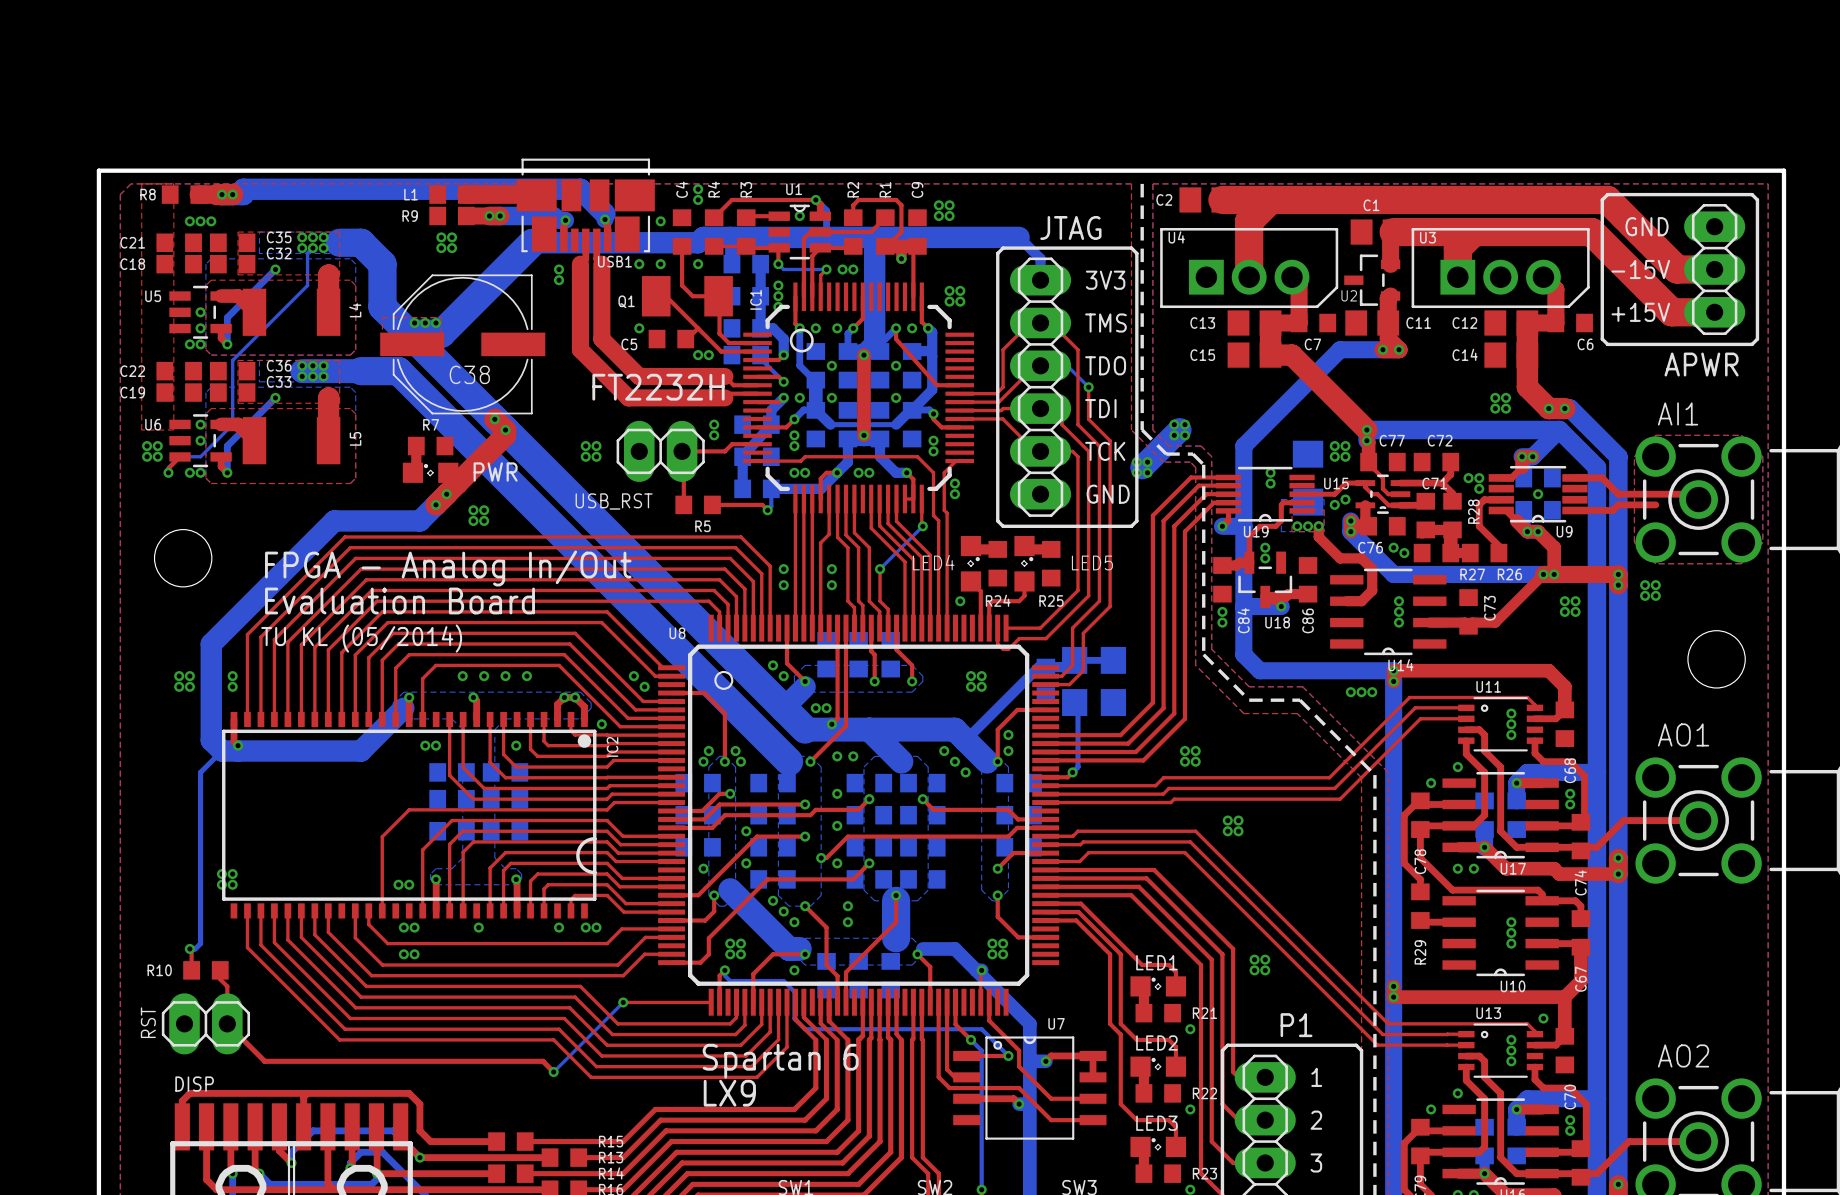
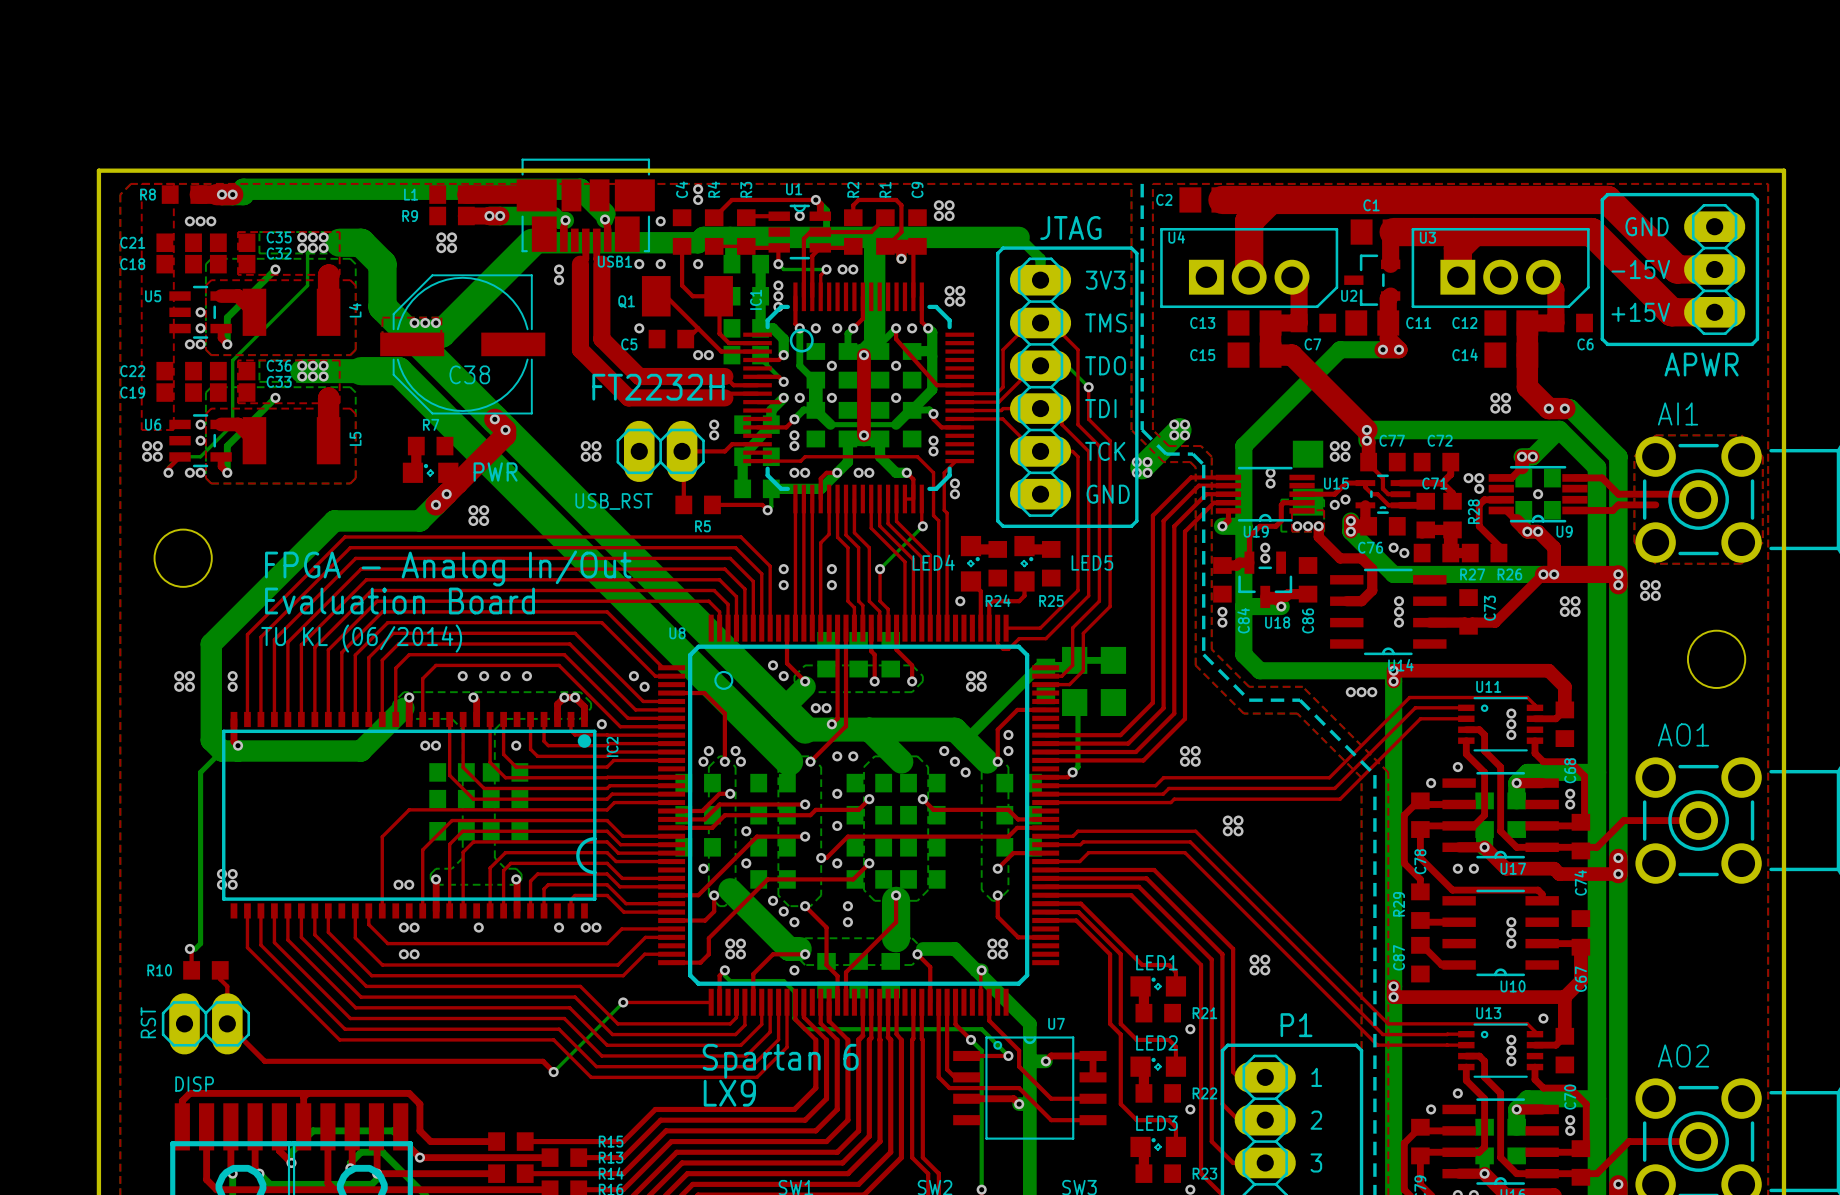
text: TU KL (05/2014) (361, 638) -> TU KL (06/2014) (361, 638)
top track: (1542, 900) (1575, 900) (1580, 906) (1580, 918) -> none
top track: none -> (1420, 945) (1441, 965) (1459, 965)
R29 name position: R29 (1420, 952) -> R29 (1399, 904)
C87: none -> (1420, 959)

